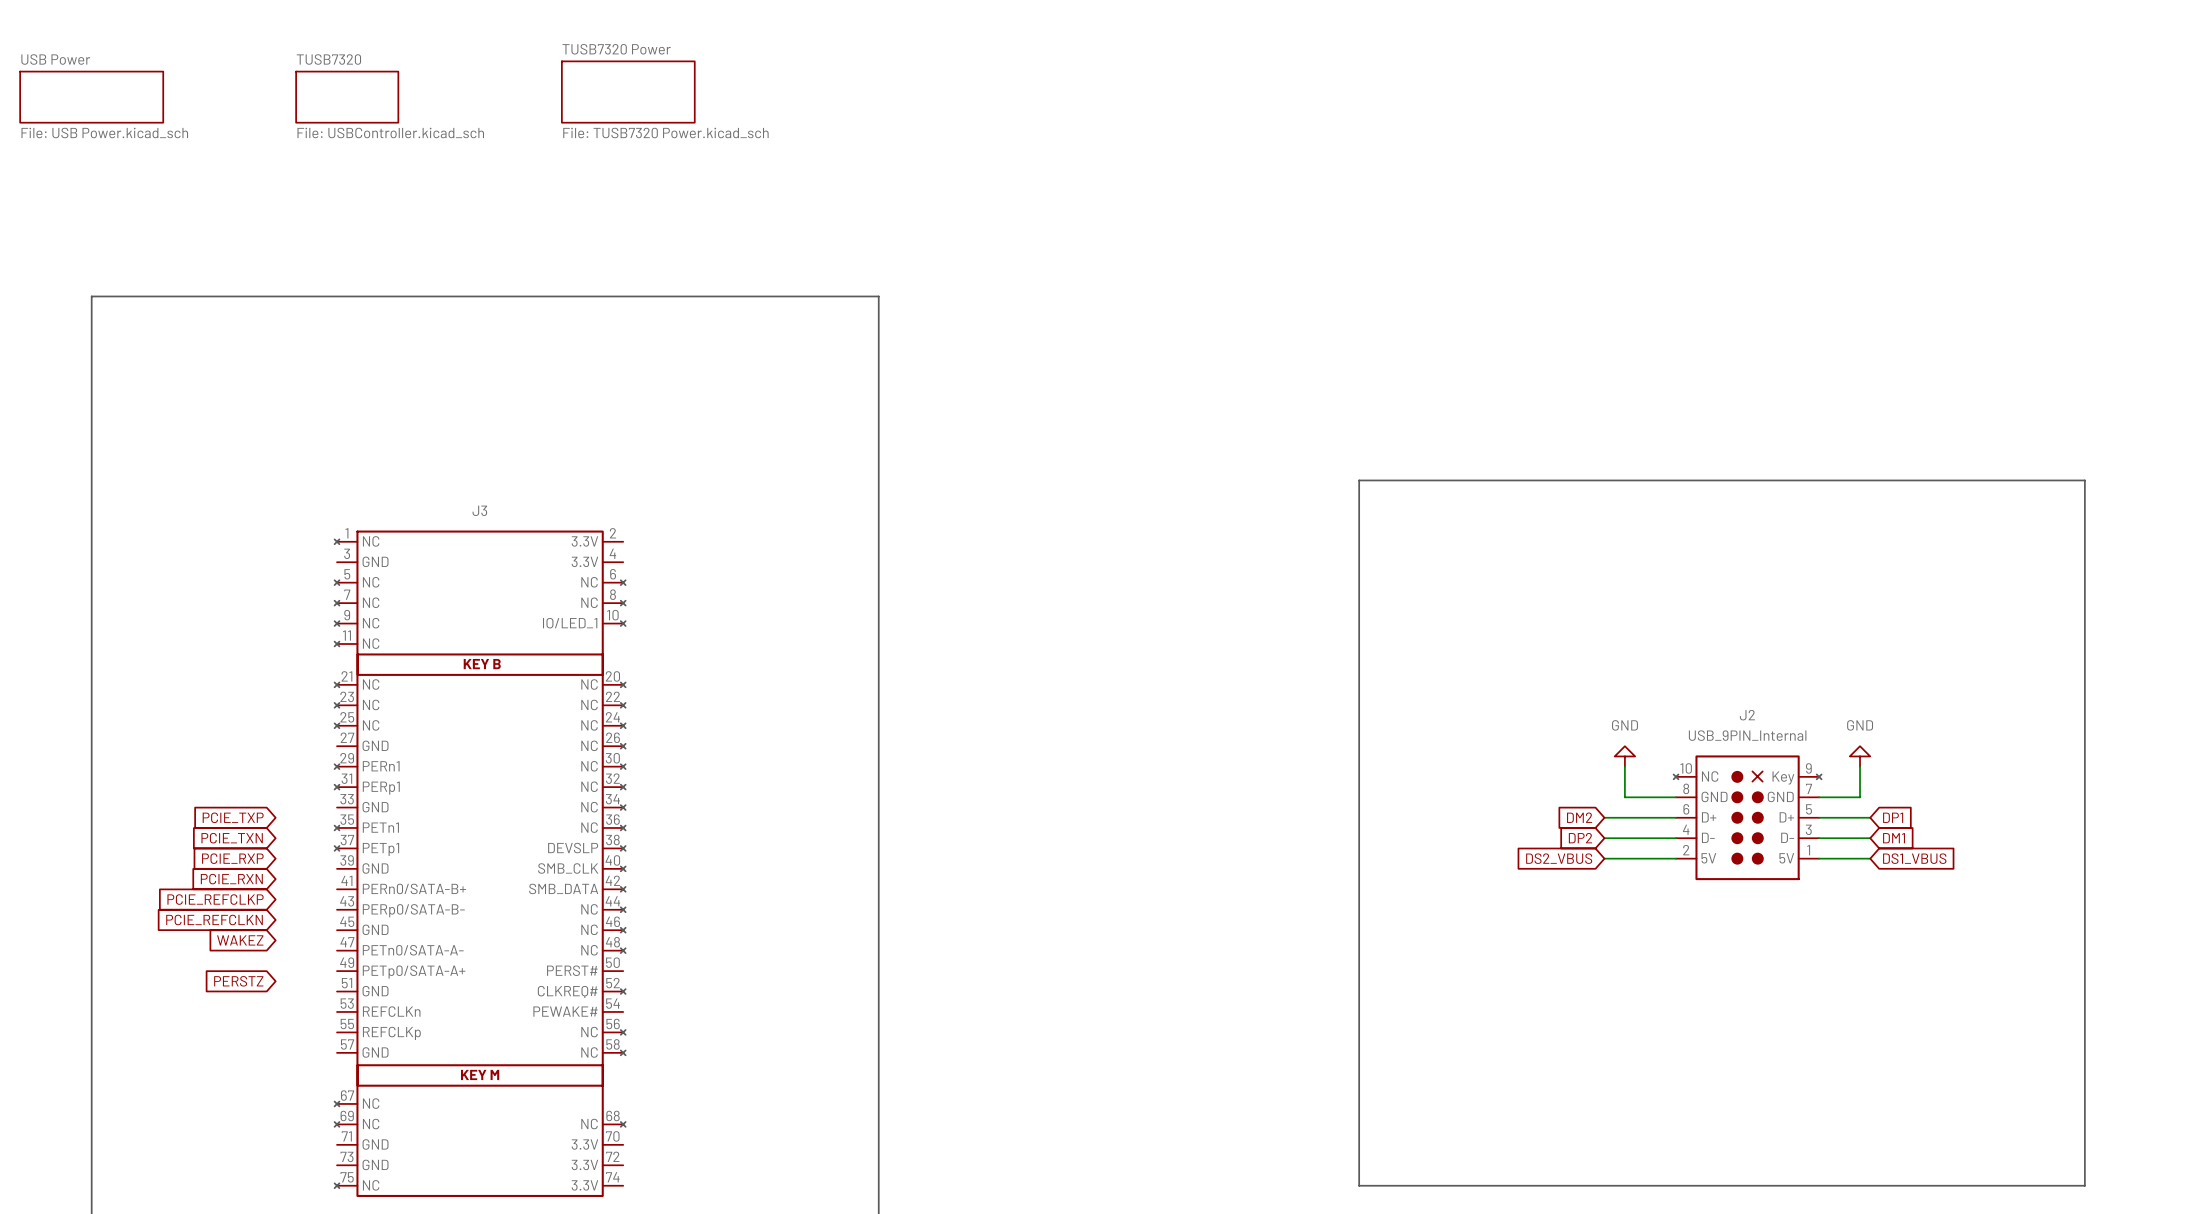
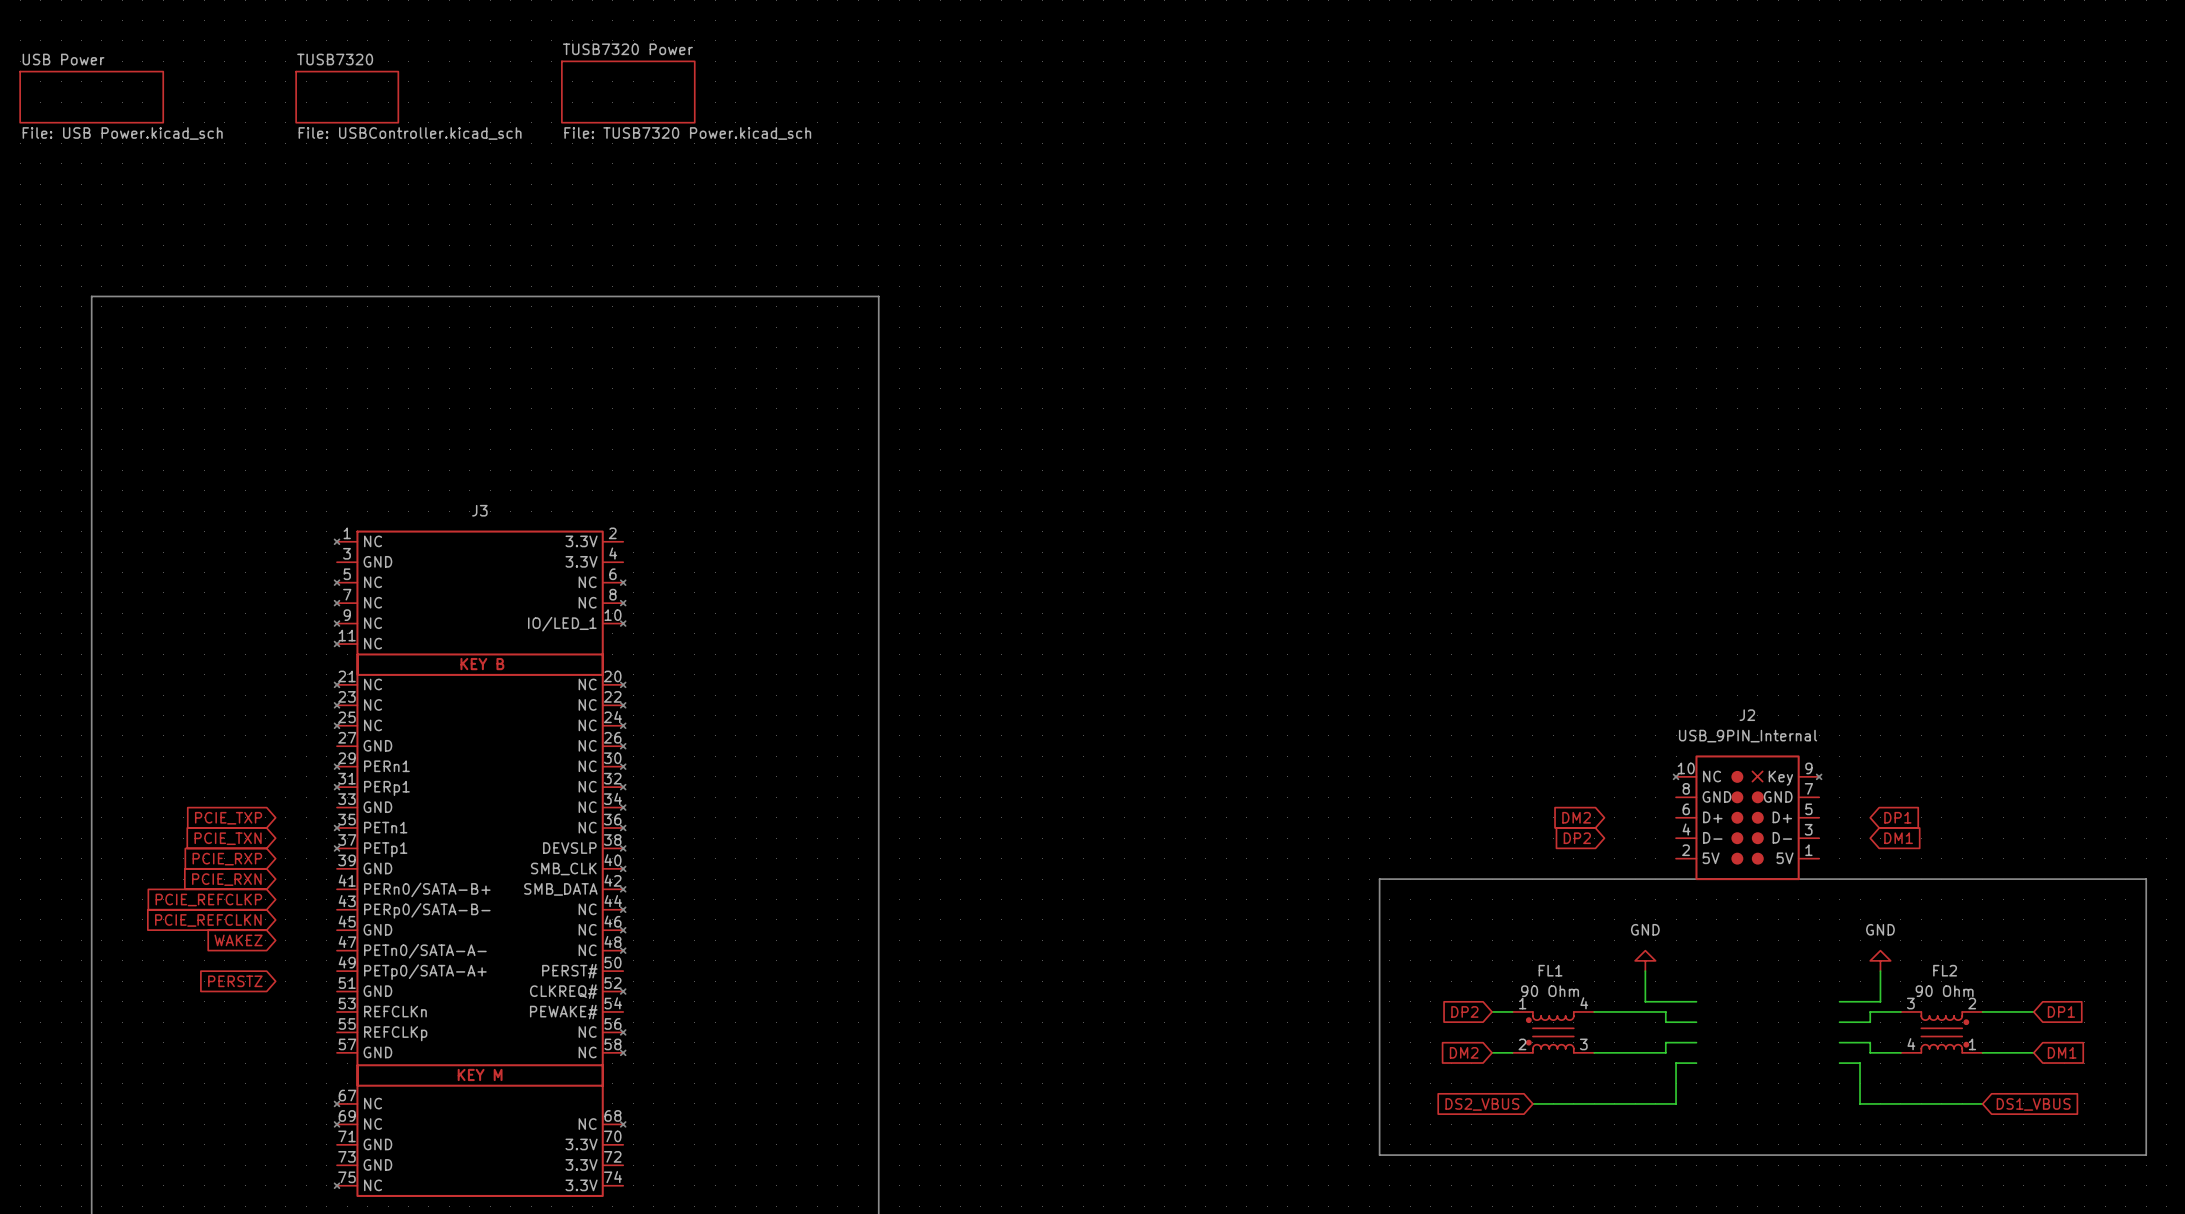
line: (1359, 480) (2084, 480) (2084, 1185) (1359, 1185) (1359, 480) -> none
power symbol: GND (1624, 756) -> none
power symbol: GND (1860, 756) -> none
wire: (1624, 766) (1624, 797) (1676, 797) -> none
wire: (1860, 766) (1860, 797) (1819, 797) -> none
wire: (1604, 817) (1676, 817) -> none
wire: (1819, 817) (1870, 817) -> none
wire: (1604, 838) (1676, 838) -> none
wire: (1819, 838) (1870, 838) -> none
global label: DS2_VBUS (1559, 858) -> none
wire: (1604, 858) (1676, 858) -> none
wire: (1819, 858) (1870, 858) -> none
global label: DS1_VBUS (1914, 858) -> none
line: none -> (1379, 879) (2146, 879) (2146, 1155) (1379, 1155) (1379, 879)
power symbol: none -> GND (1645, 960)
power symbol: none -> GND (1880, 960)
wire: none -> (1645, 971) (1645, 1001) (1696, 1001)
wire: none -> (1880, 971) (1880, 1001) (1839, 1001)
global label: none -> DP2 (1464, 1011)
wire: none -> (1492, 1011) (1512, 1011)
wire: none -> (1594, 1011) (1665, 1011) (1665, 1022) (1696, 1022)
wire: none -> (1900, 1011) (1870, 1011) (1870, 1022) (1839, 1022)
wire: none -> (1982, 1011) (2033, 1011)
global label: none -> DP1 (2061, 1011)
FL1: none -> 90 Ohm (1553, 1032)
FL2: none -> 90 Ohm (1941, 1032)
wire: none -> (1696, 1042) (1665, 1042) (1665, 1052) (1594, 1052)
wire: none -> (1839, 1042) (1870, 1042) (1870, 1052) (1900, 1052)
global label: none -> DM2 (1464, 1052)
wire: none -> (1492, 1052) (1512, 1052)
wire: none -> (1982, 1052) (2033, 1052)
global label: none -> DM1 (2062, 1052)
wire: none -> (1696, 1063) (1676, 1063) (1676, 1103) (1532, 1103)
wire: none -> (1839, 1063) (1860, 1063) (1860, 1103) (1982, 1103)
global label: none -> DS2_VBUS (1482, 1104)
global label: none -> DS1_VBUS (2033, 1104)

